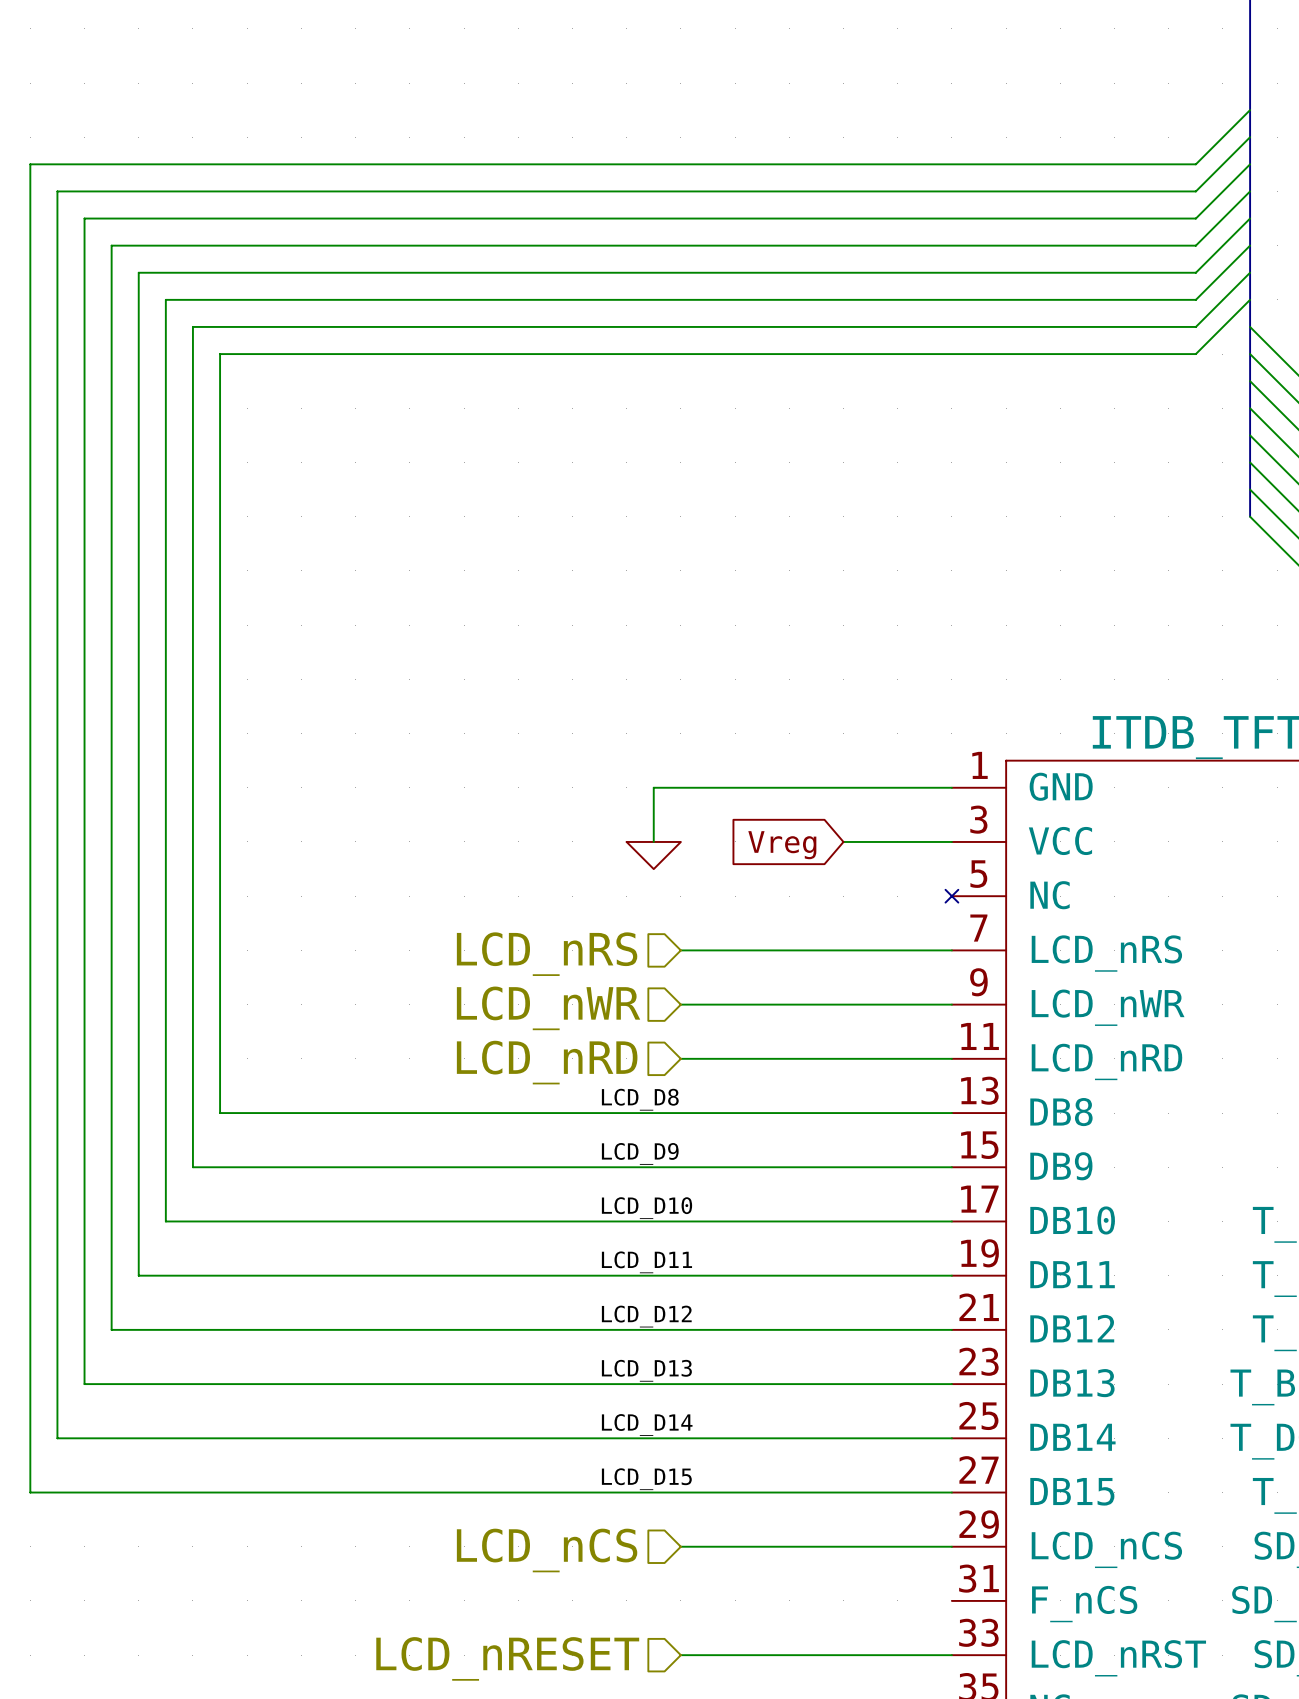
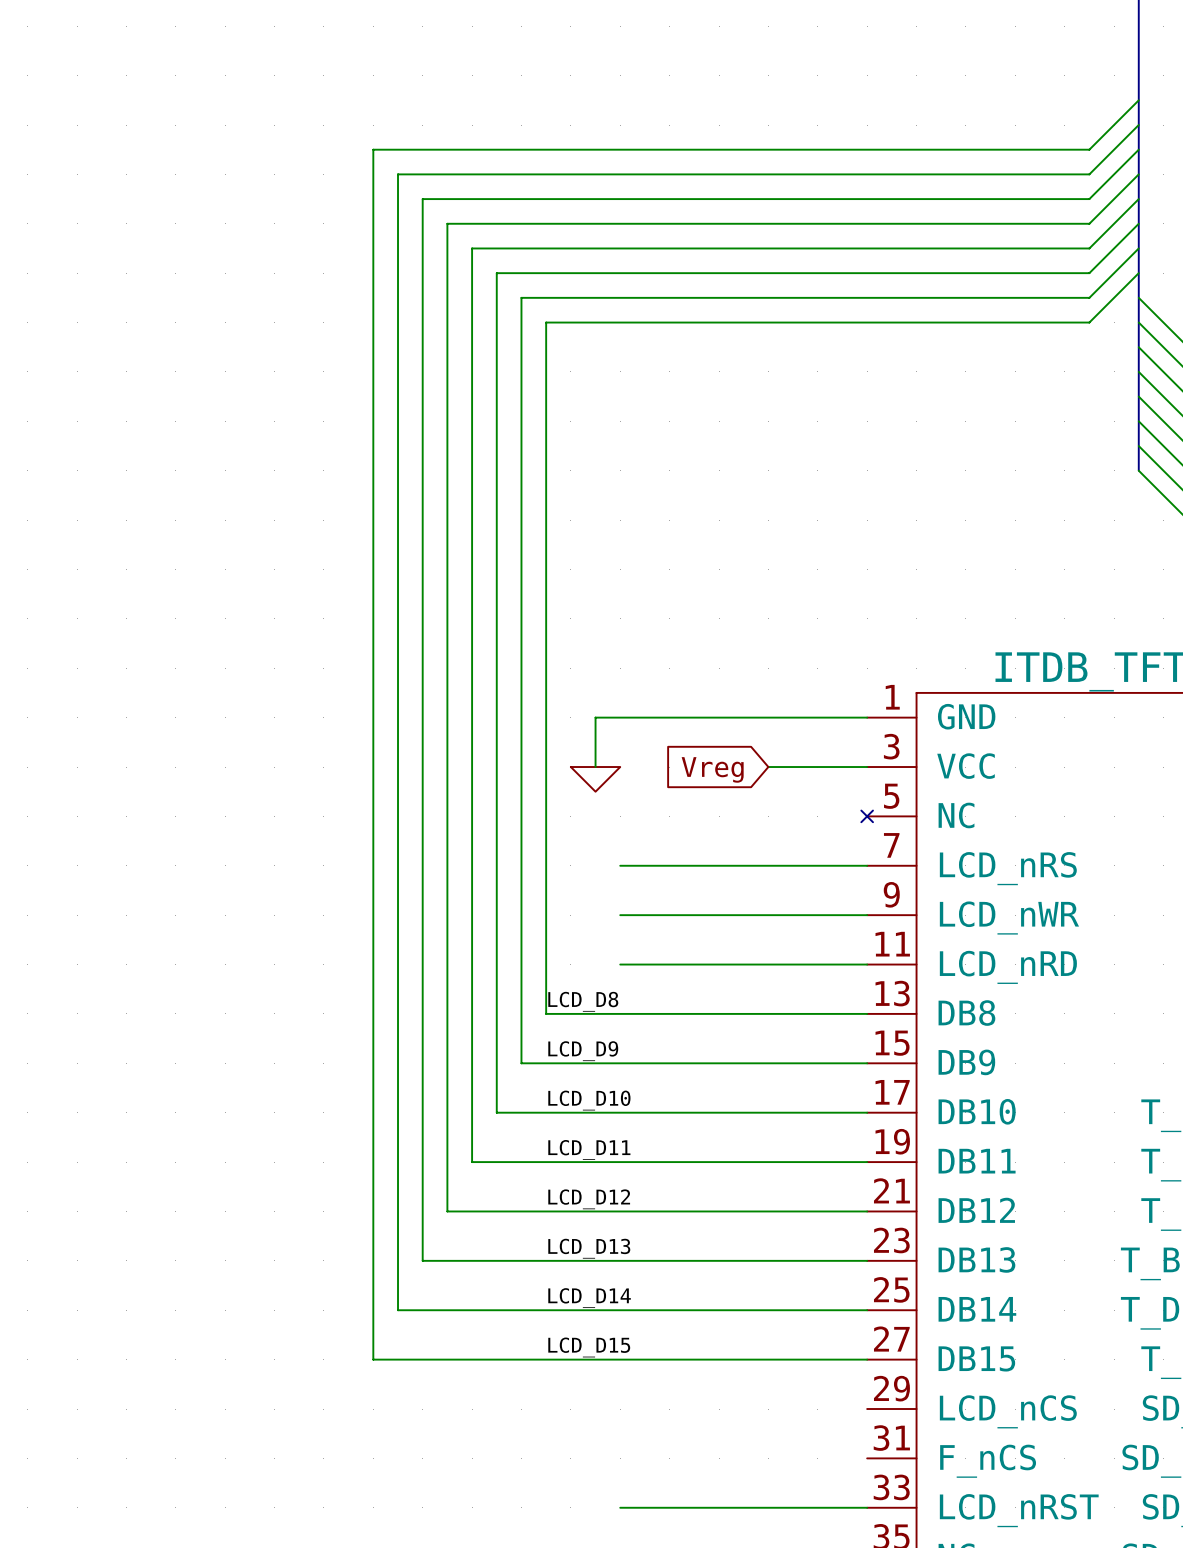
wire: (409, 164) (30, 164) (30, 1492) (409, 1492) -> (373, 149) (373, 1359)
wire: (436, 191) (57, 191) (57, 1438) (436, 1438) -> (398, 174) (398, 1310)
wire: (464, 218) (84, 218) (84, 1384) (464, 1384) -> (422, 199) (422, 1260)
wire: (491, 245) (111, 245) (111, 1329) (491, 1329) -> (447, 223) (447, 1211)
wire: (518, 272) (138, 272) (138, 1275) (518, 1275) -> (472, 248) (472, 1162)
wire: (545, 299) (165, 299) (165, 1221) (545, 1221) -> (496, 273) (496, 1112)
wire: (572, 326) (192, 326) (192, 1167) (572, 1167) -> (521, 297) (521, 1063)
wire: (599, 354) (220, 354) (220, 1113) (599, 1113) -> (546, 322) (546, 1013)
hierarchical label: LCD_nRS (547, 954) -> none
hierarchical label: LCD_nWR (548, 1008) -> none
hierarchical label: LCD_nRD (547, 1062) -> none
wire: (680, 1546) (951, 1546) -> none
hierarchical label: LCD_nCS (547, 1550) -> none
hierarchical label: LCD_nRESET (507, 1658) -> none

